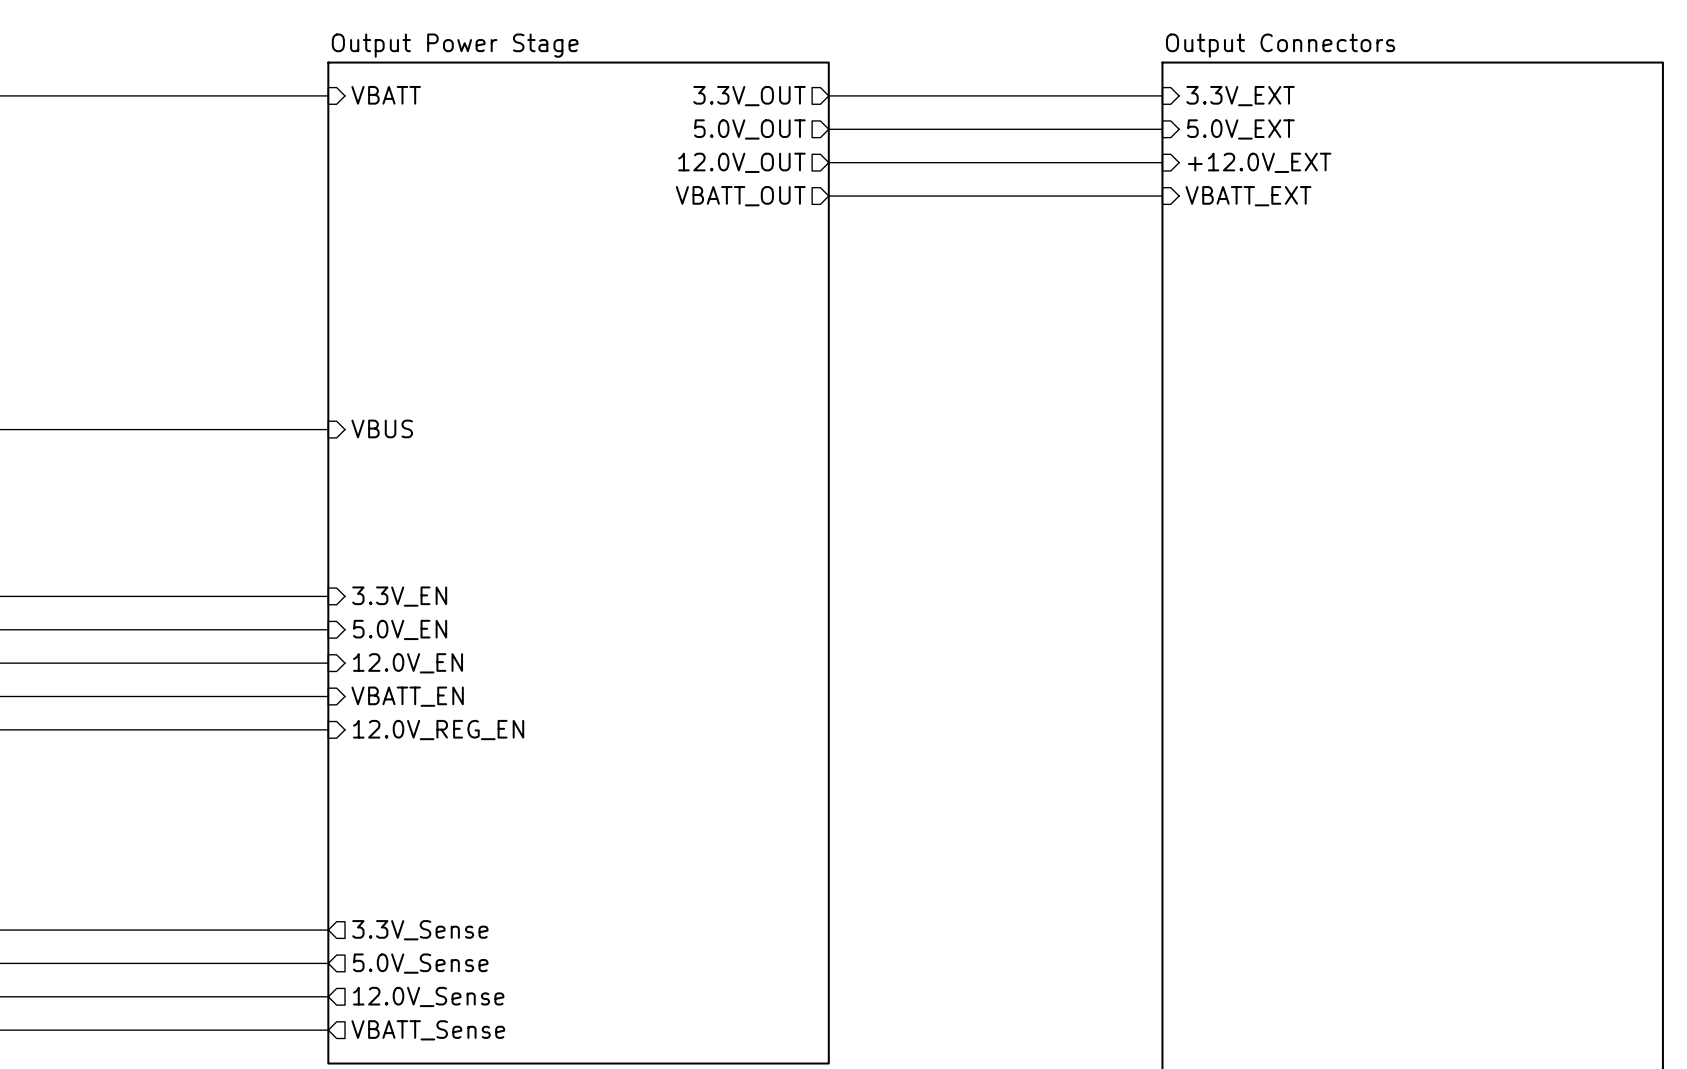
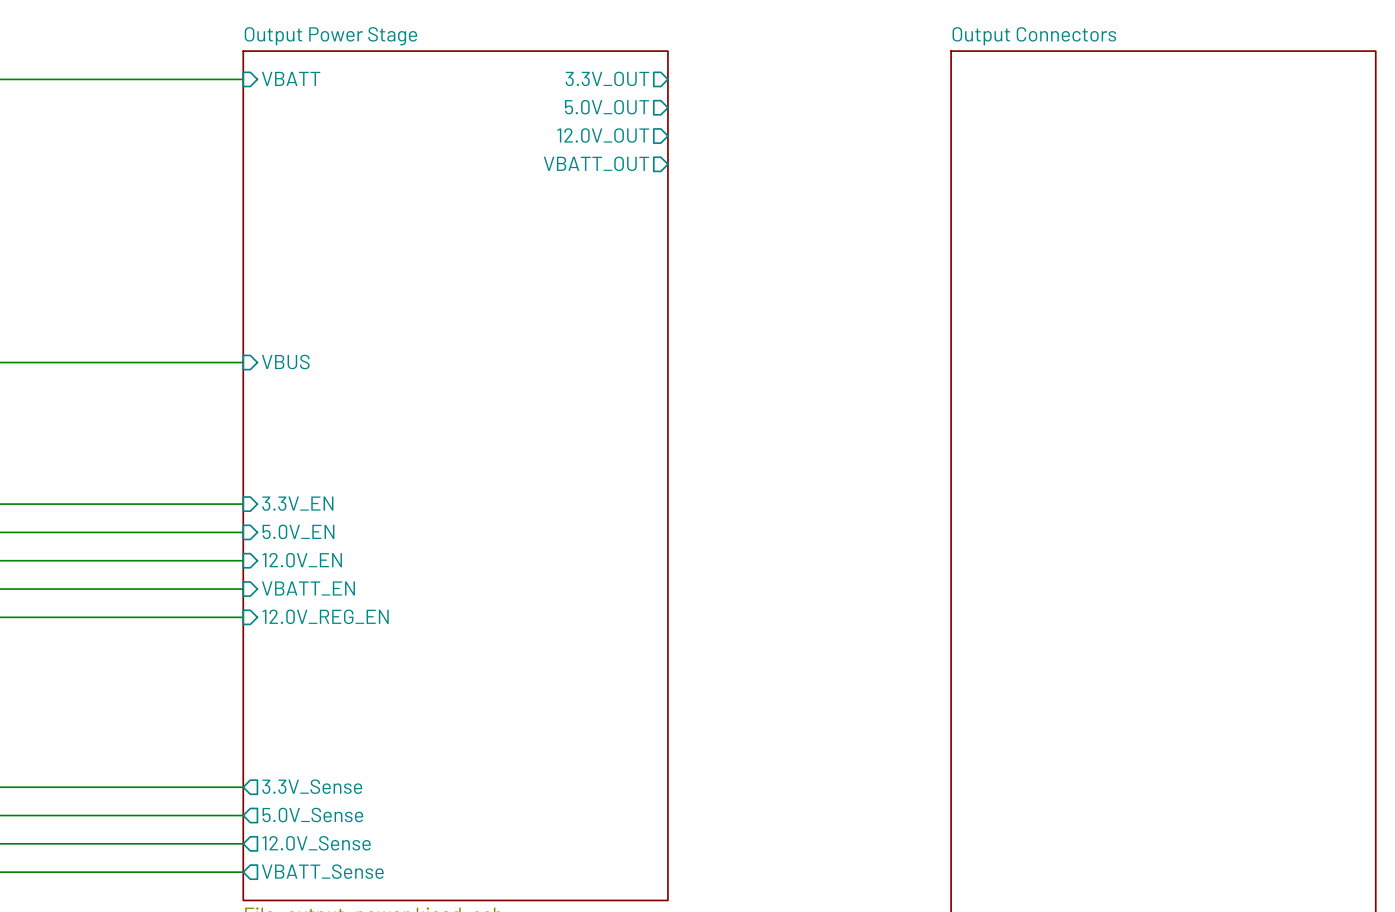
wire: (828, 95) (1162, 95) -> none
sheet pin: 3.3V_EXT (1240, 96) -> none
wire: (828, 129) (1162, 129) -> none
sheet pin: 5.0V_EXT (1240, 129) -> none
wire: (828, 162) (1162, 162) -> none
sheet pin: +12.0V_EXT (1259, 162) -> none
wire: (828, 196) (1162, 196) -> none
sheet pin: VBATT_EXT (1248, 196) -> none

